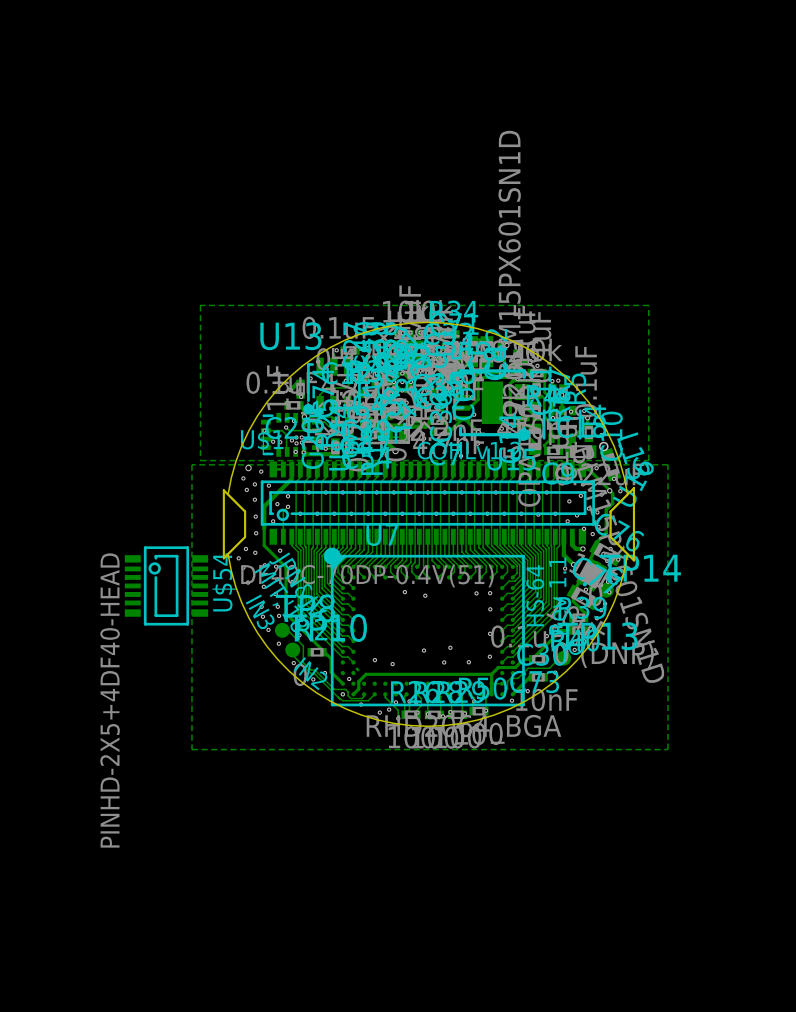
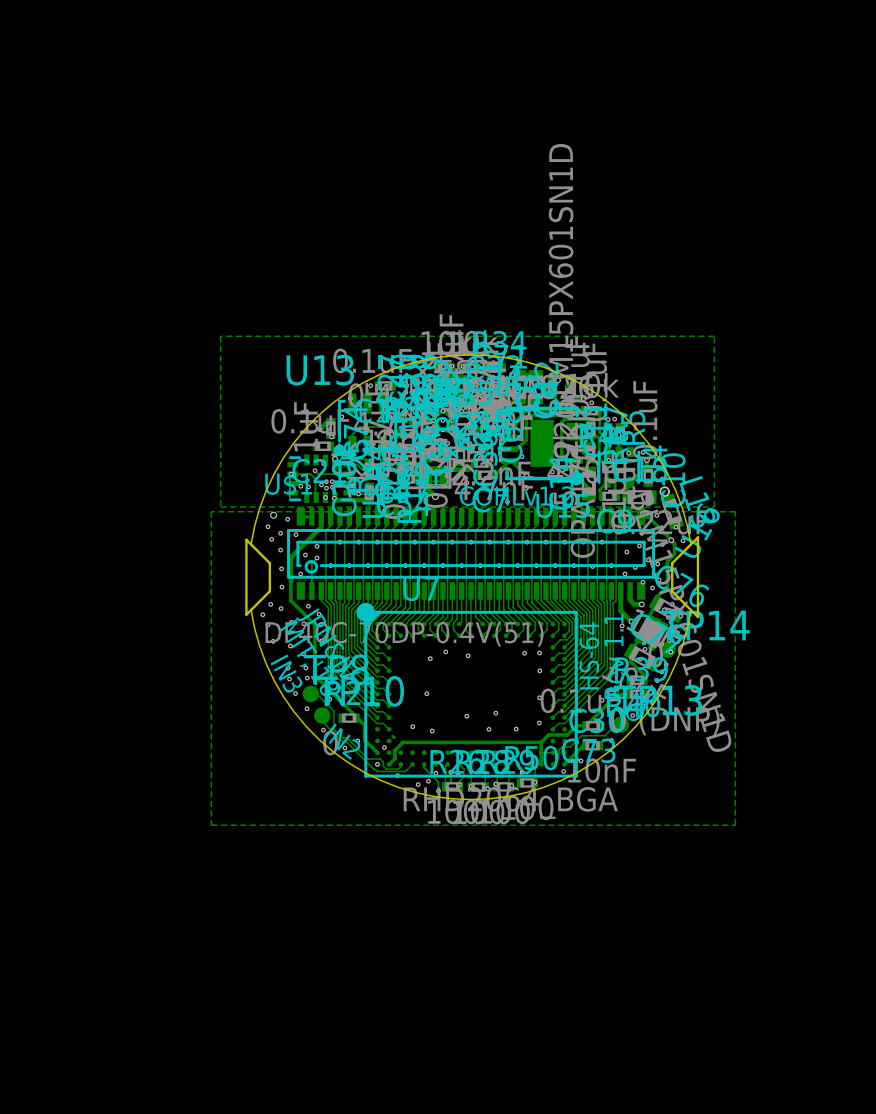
via: none -> (318, 614)
U$54: PINHD-2X5+4DF40-HEAD (166, 585) -> none
via: none -> (430, 658)
via: none -> (426, 693)

